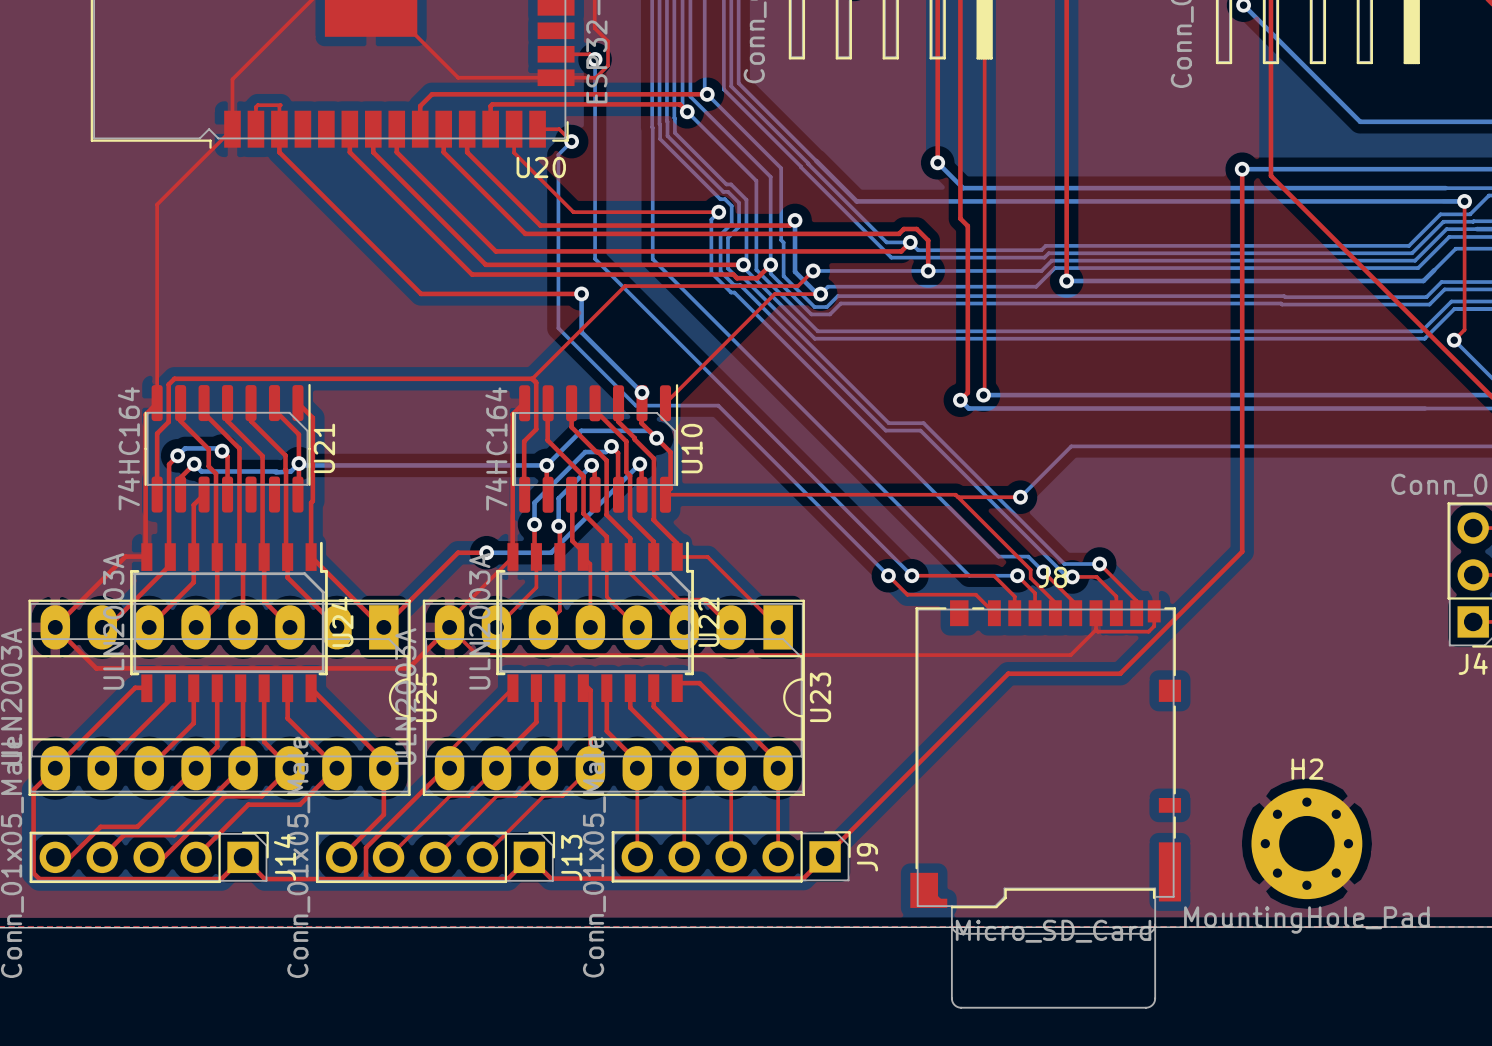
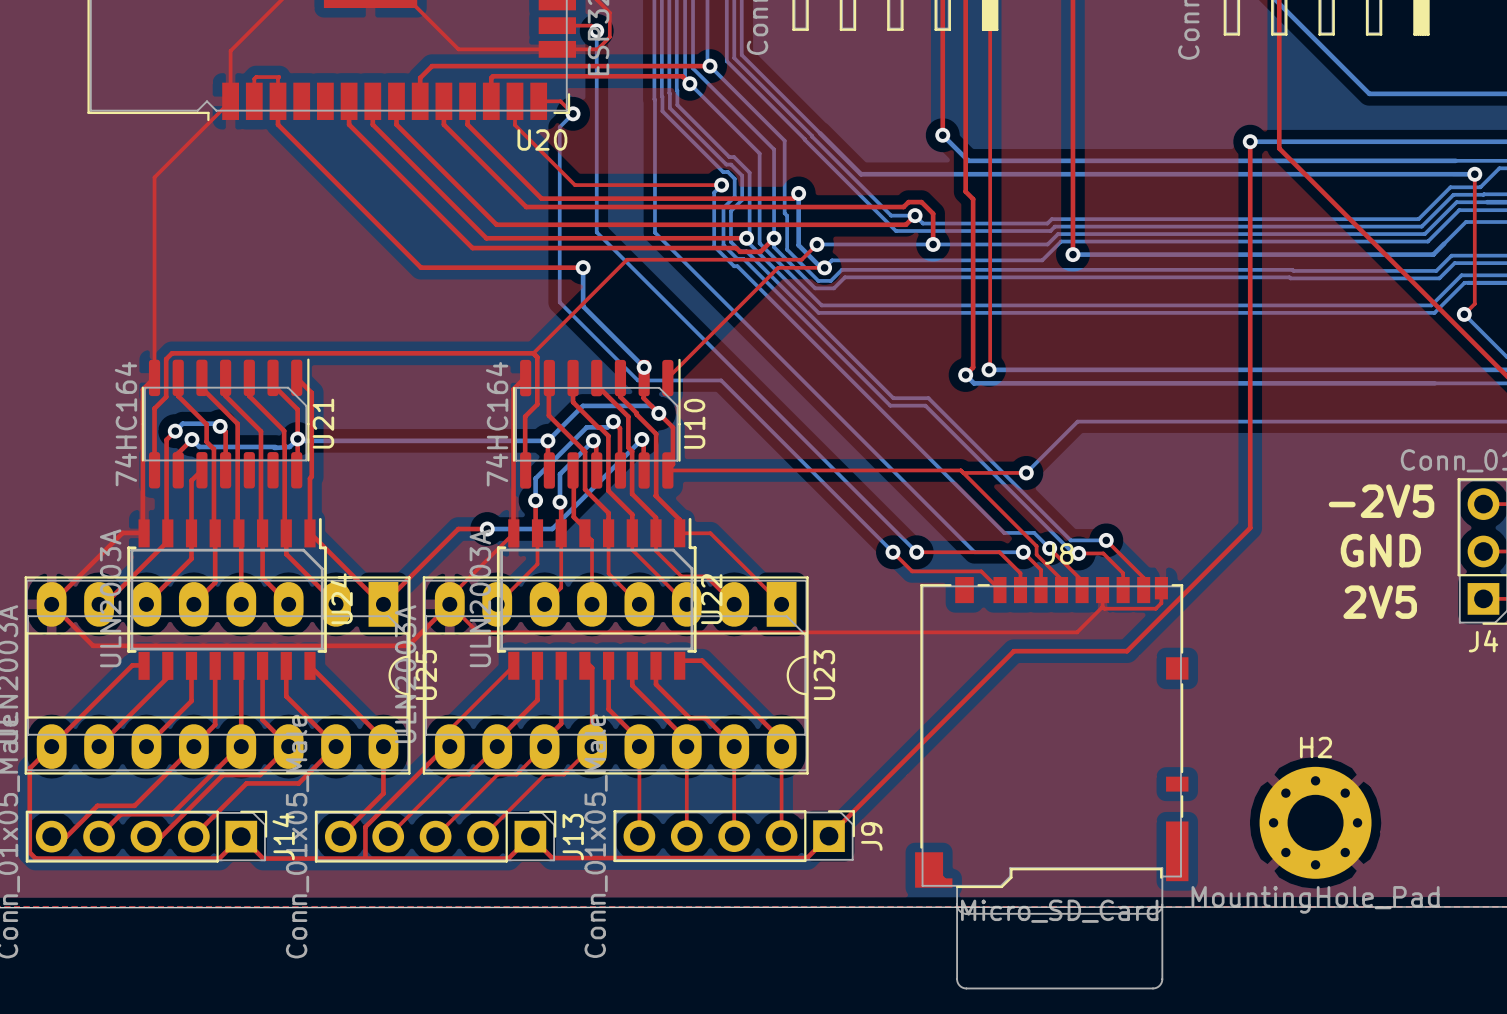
text: none -> -2V5 (1381, 501)
text: none -> GND (1380, 550)
text: none -> 2V5 (1380, 602)

